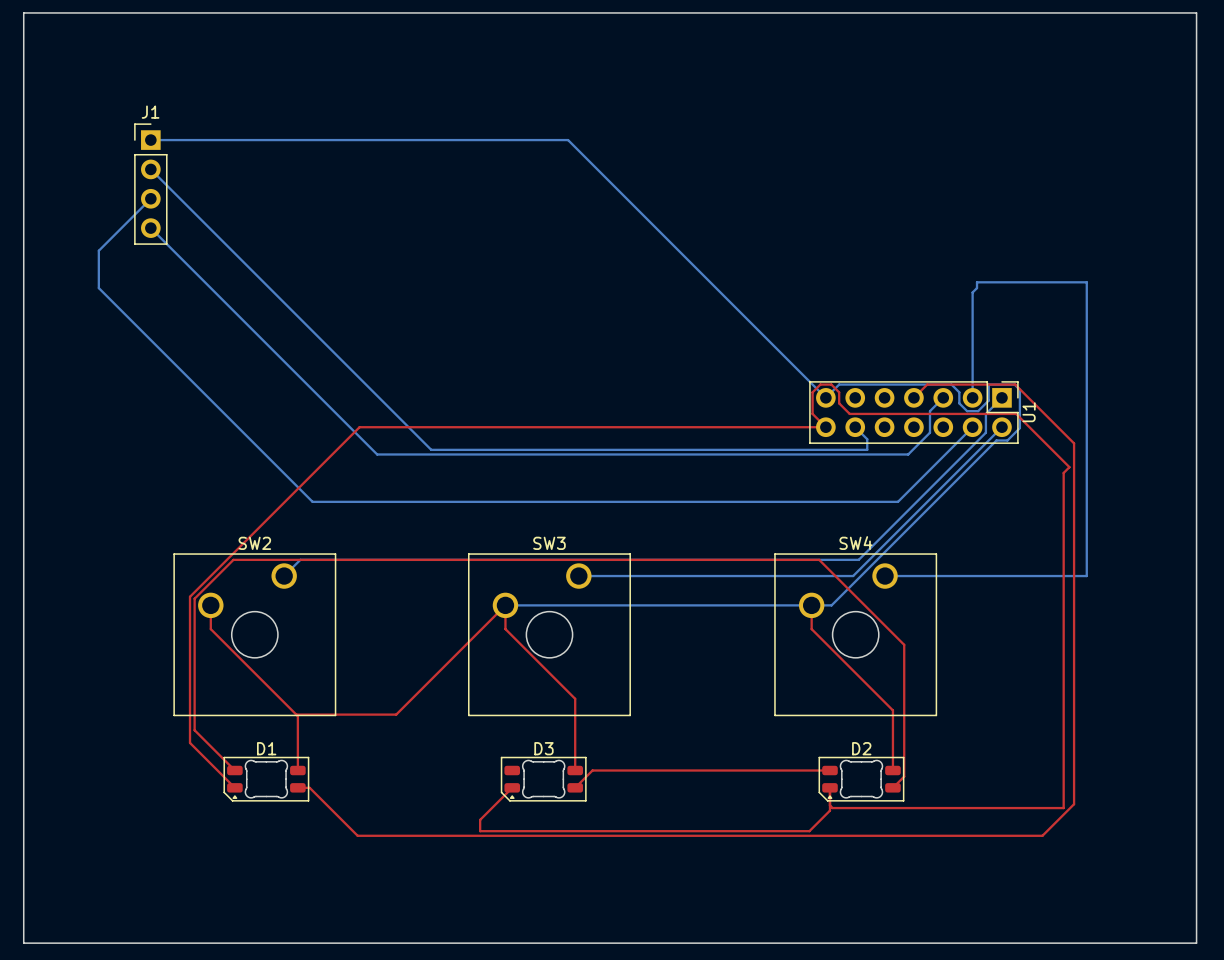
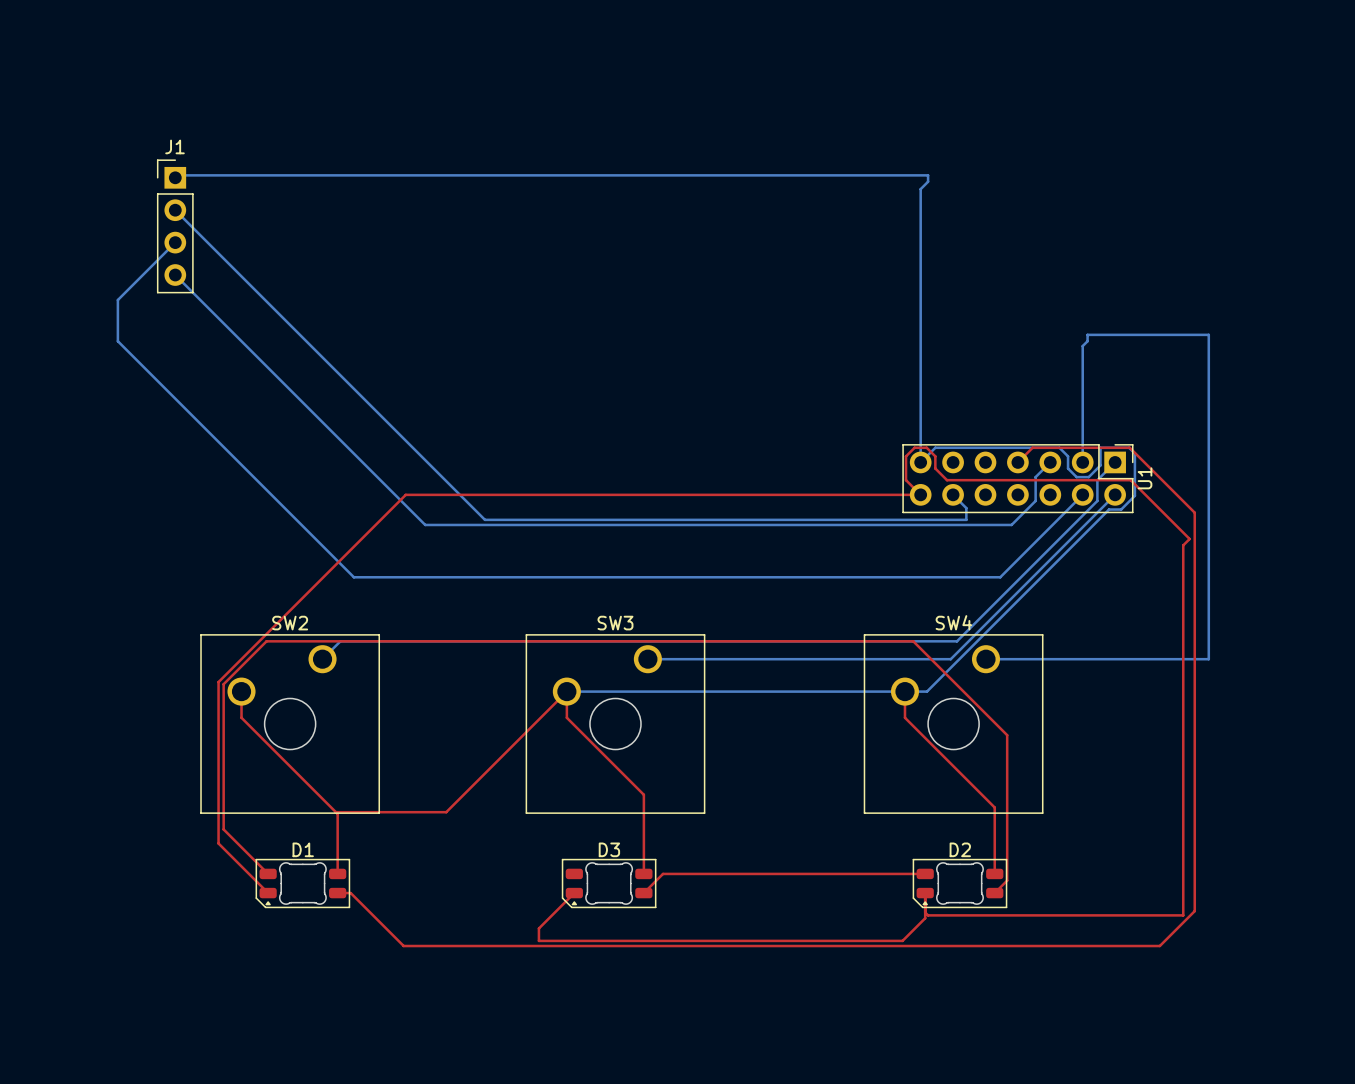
board edge: (23, 12) (1196, 12) (1196, 943) (23, 943) (23, 12) -> none
bottom track: (150, 140) (568, 140) (825, 397) -> (177, 175) (928, 175) (928, 181) (920, 189) (920, 462)

